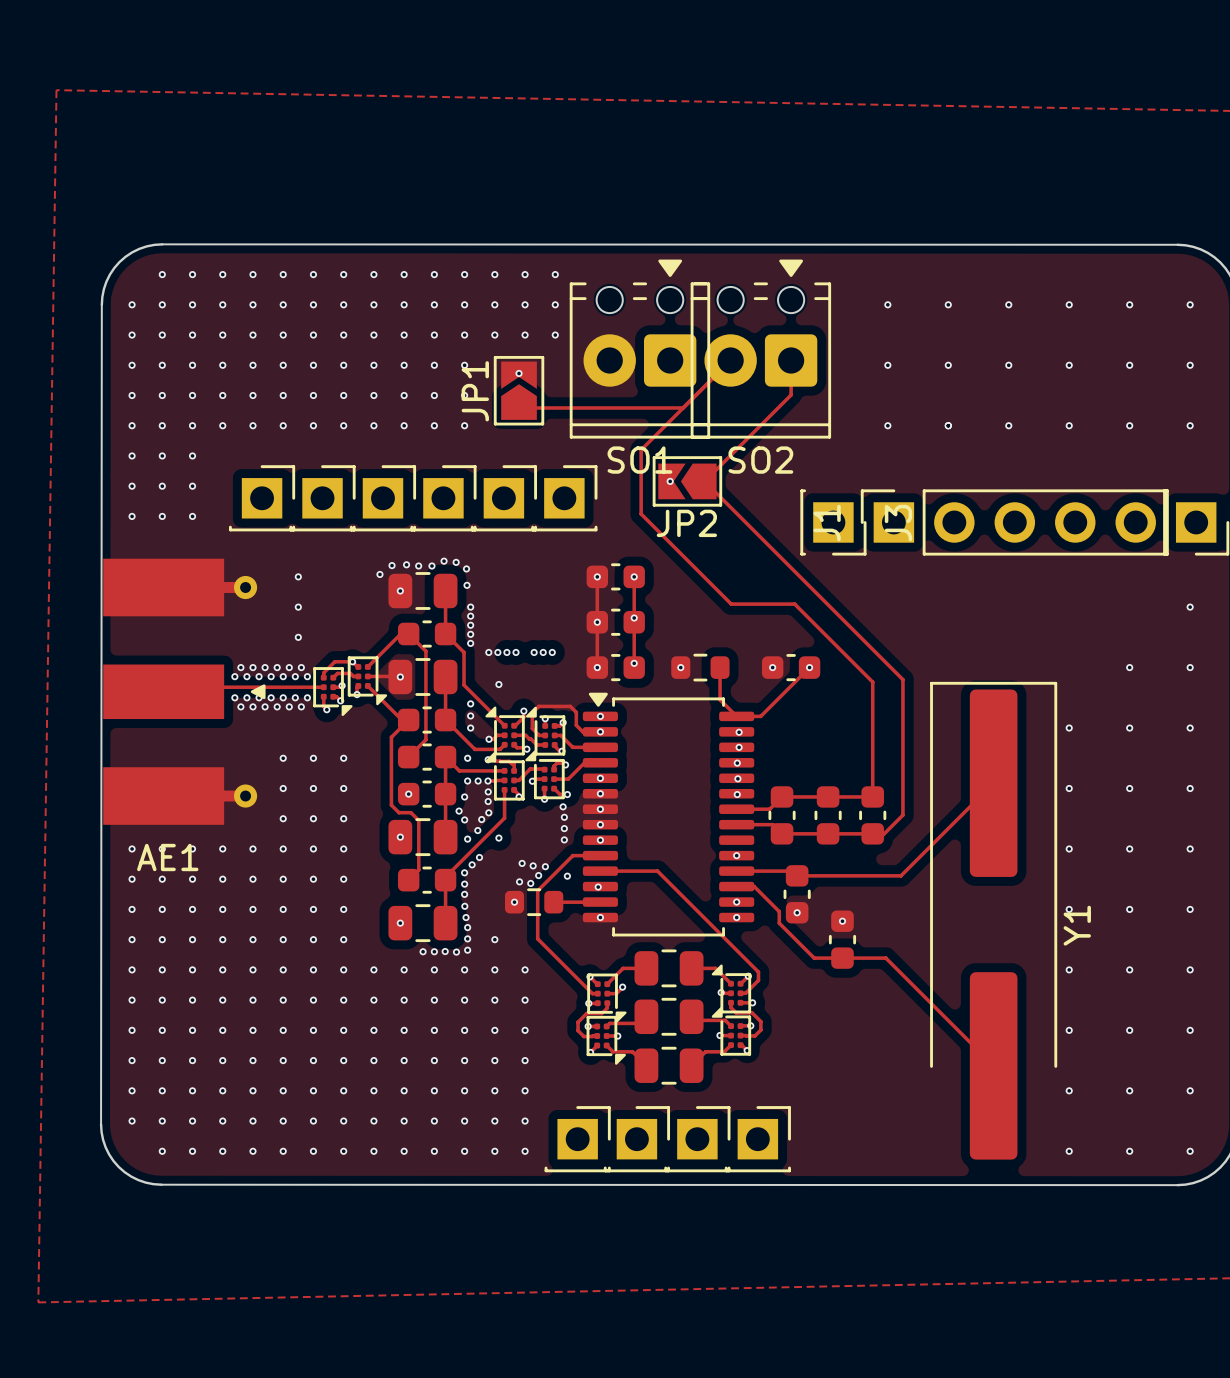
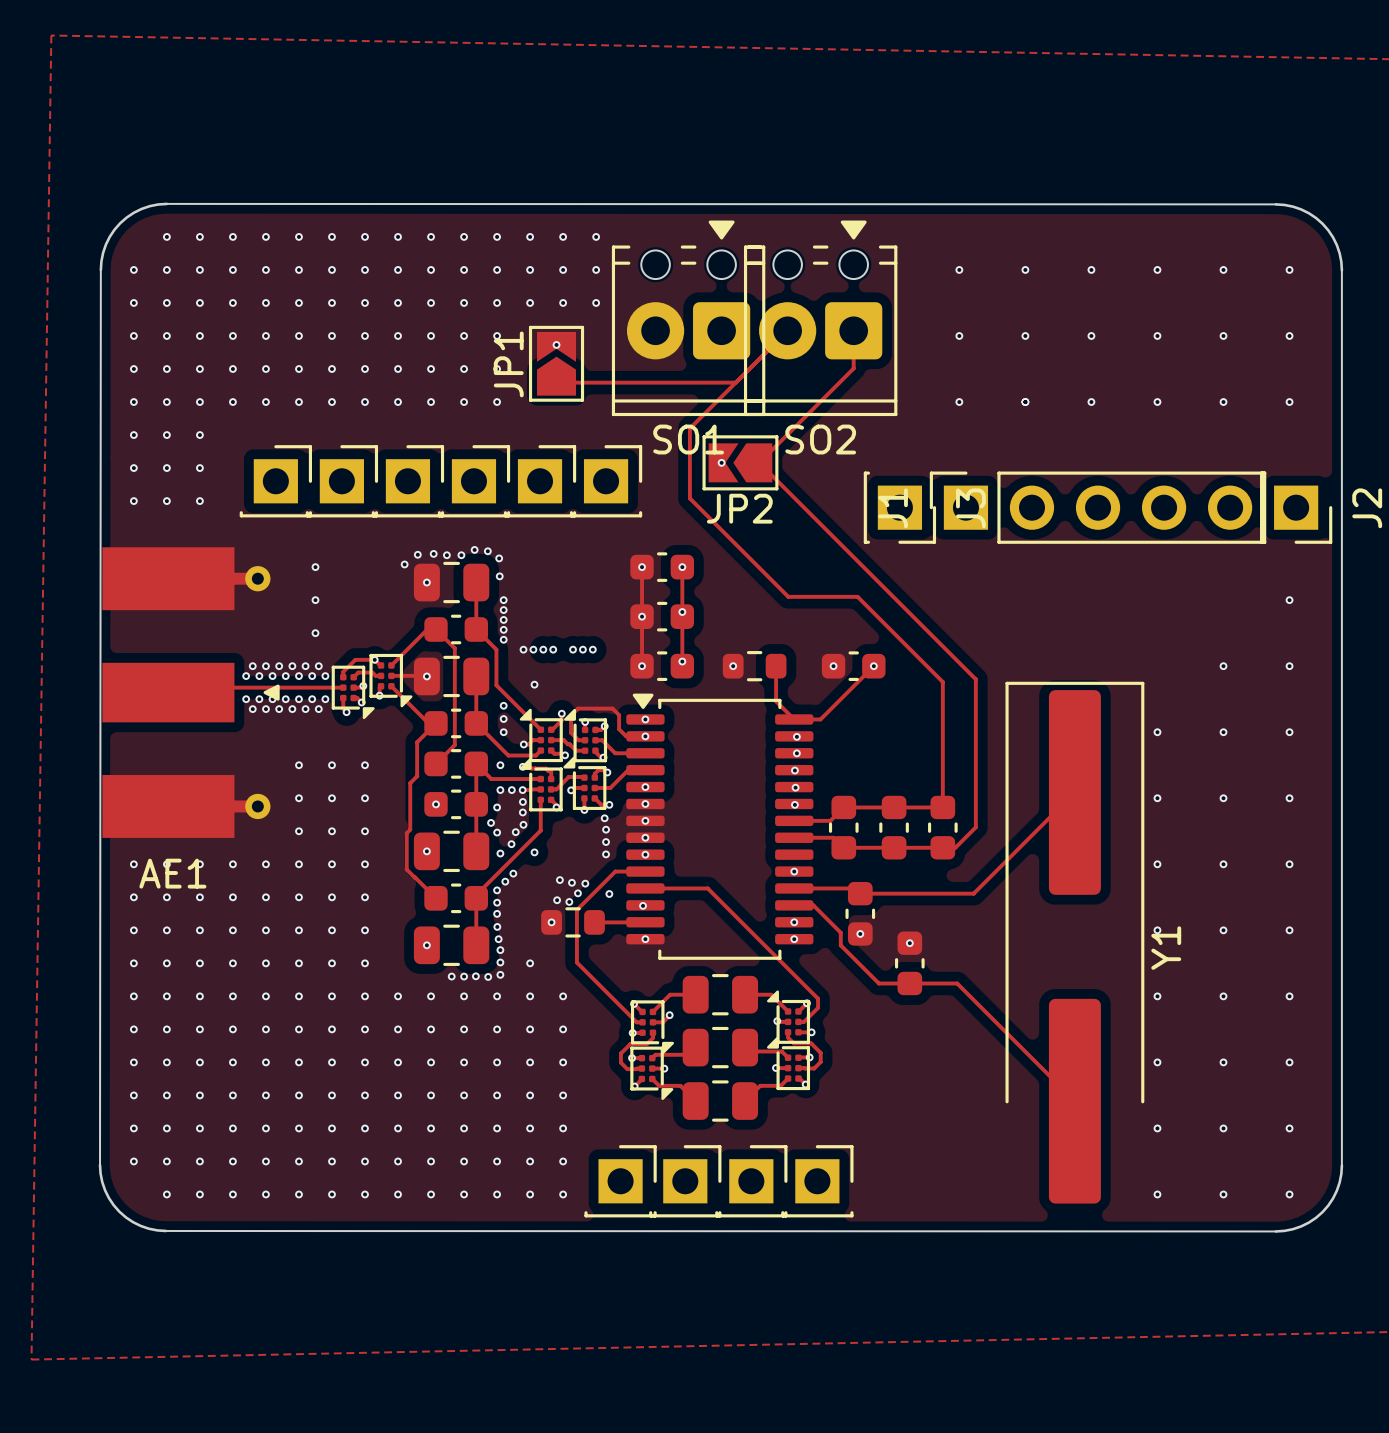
track: (391, 768) (391, 805) (398, 812) (411, 812) (418, 820) (418, 870) (408, 880) -> (417, 776) (410, 783) (410, 829) (406, 833) (406, 869) (414, 877)
track: none -> (415, 877) (435, 898)

